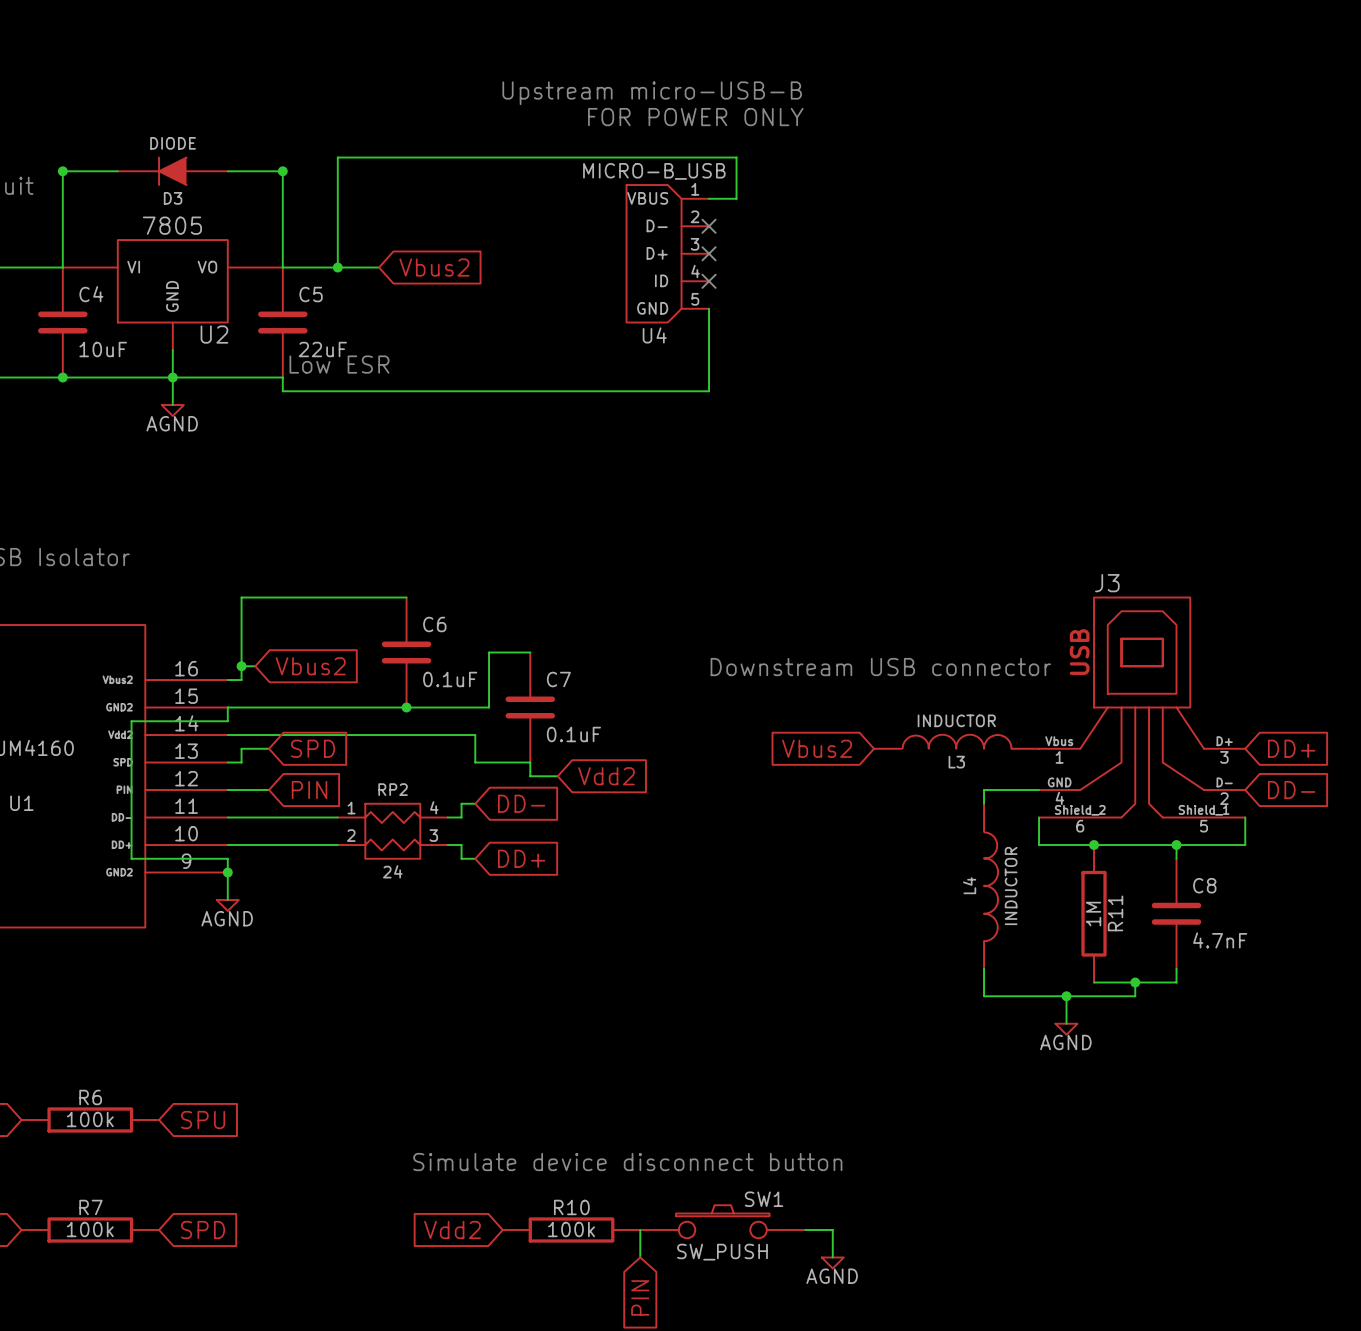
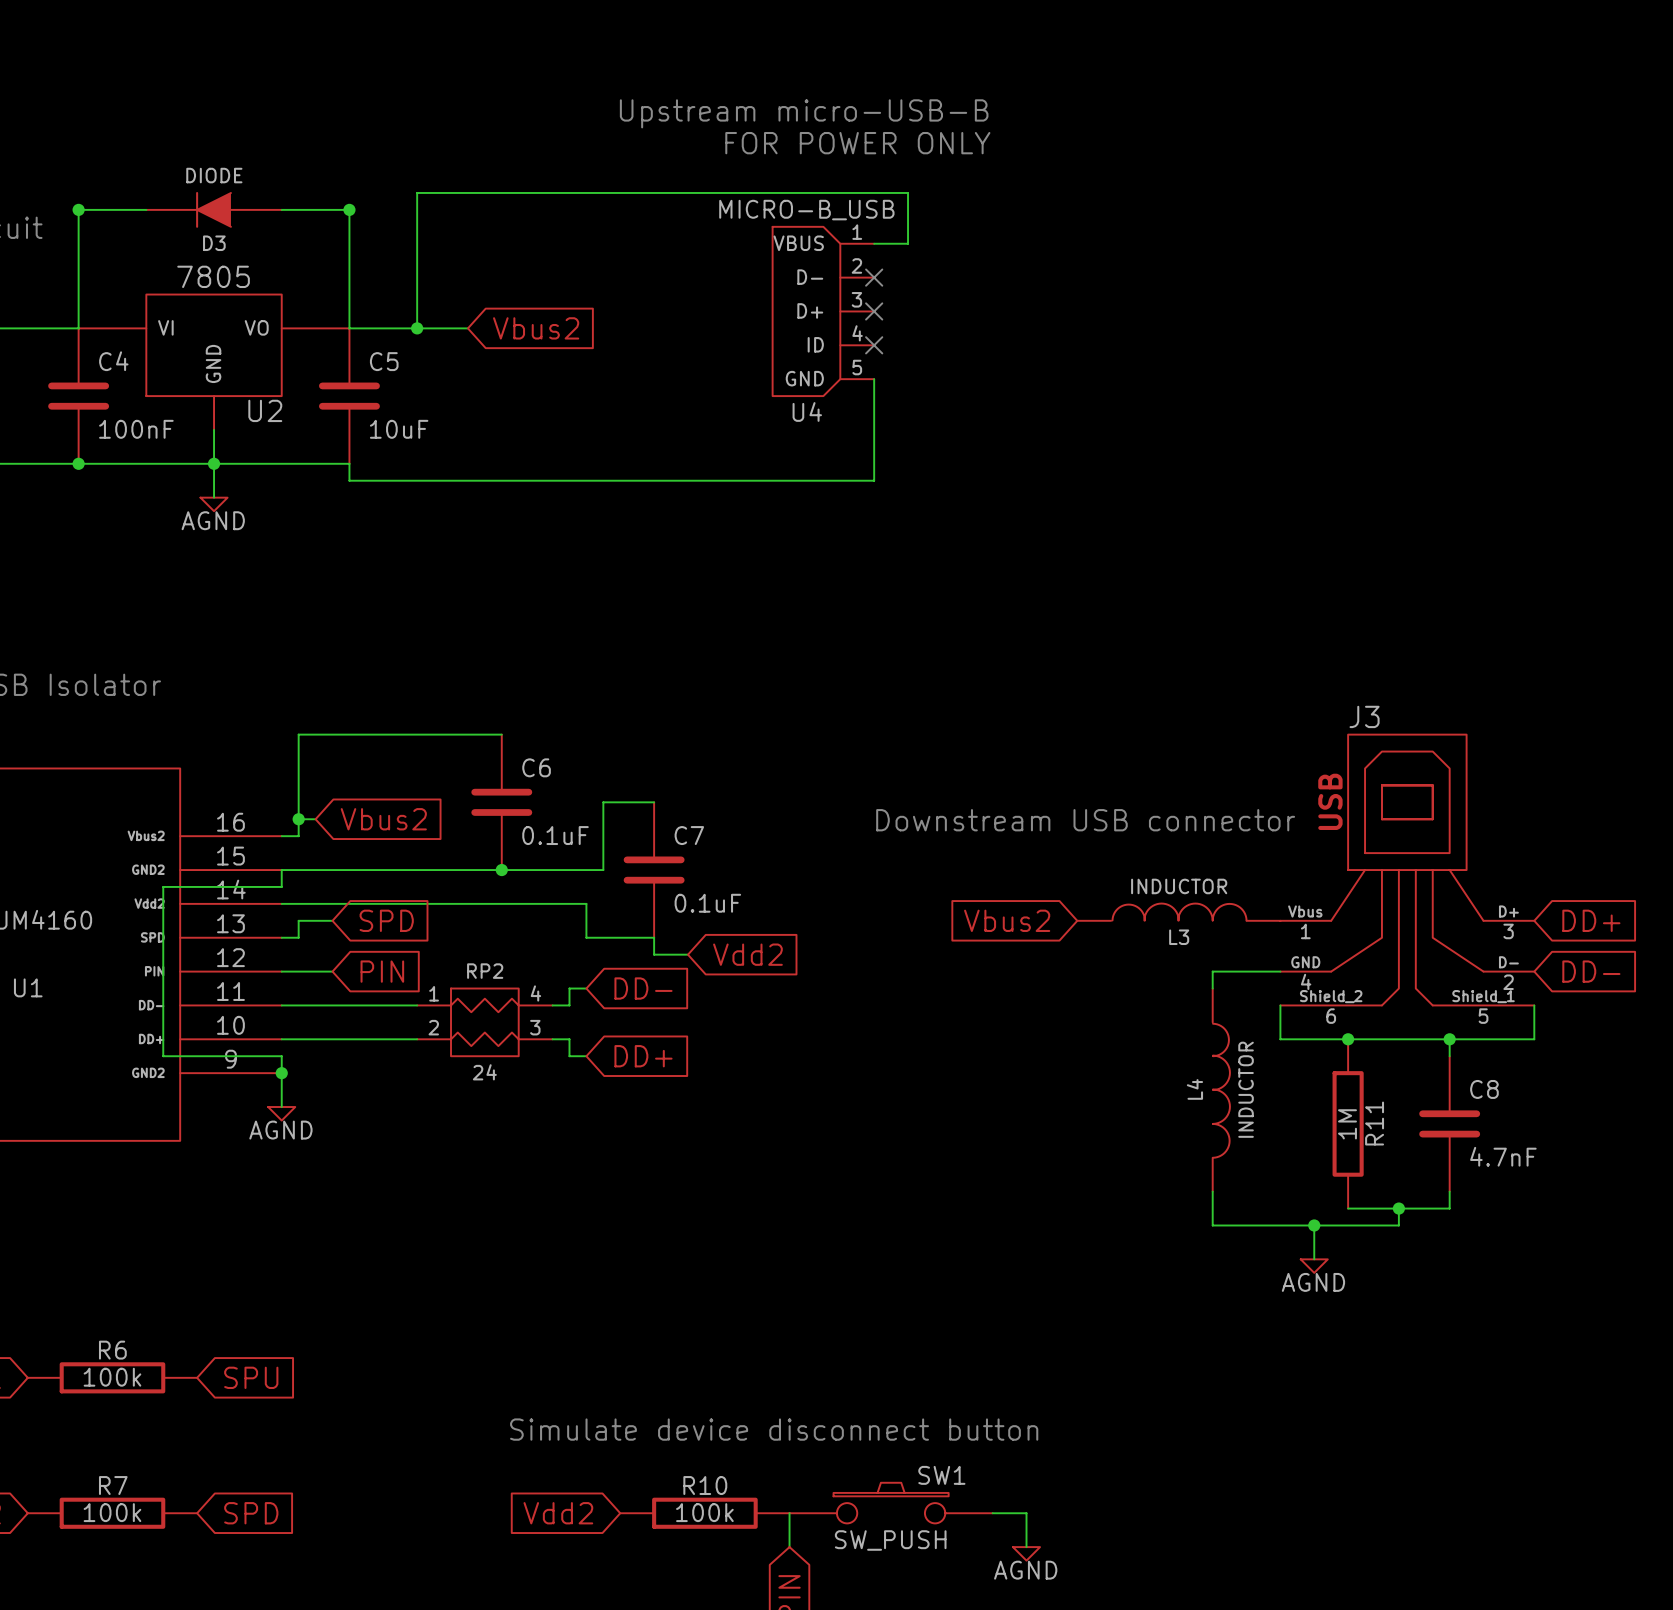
C4 value: 10uF (103, 349) -> 100nF (136, 429)
C5 value: 22uF (322, 349) -> 10uF (399, 429)
text: Low ESR (339, 364) -> none

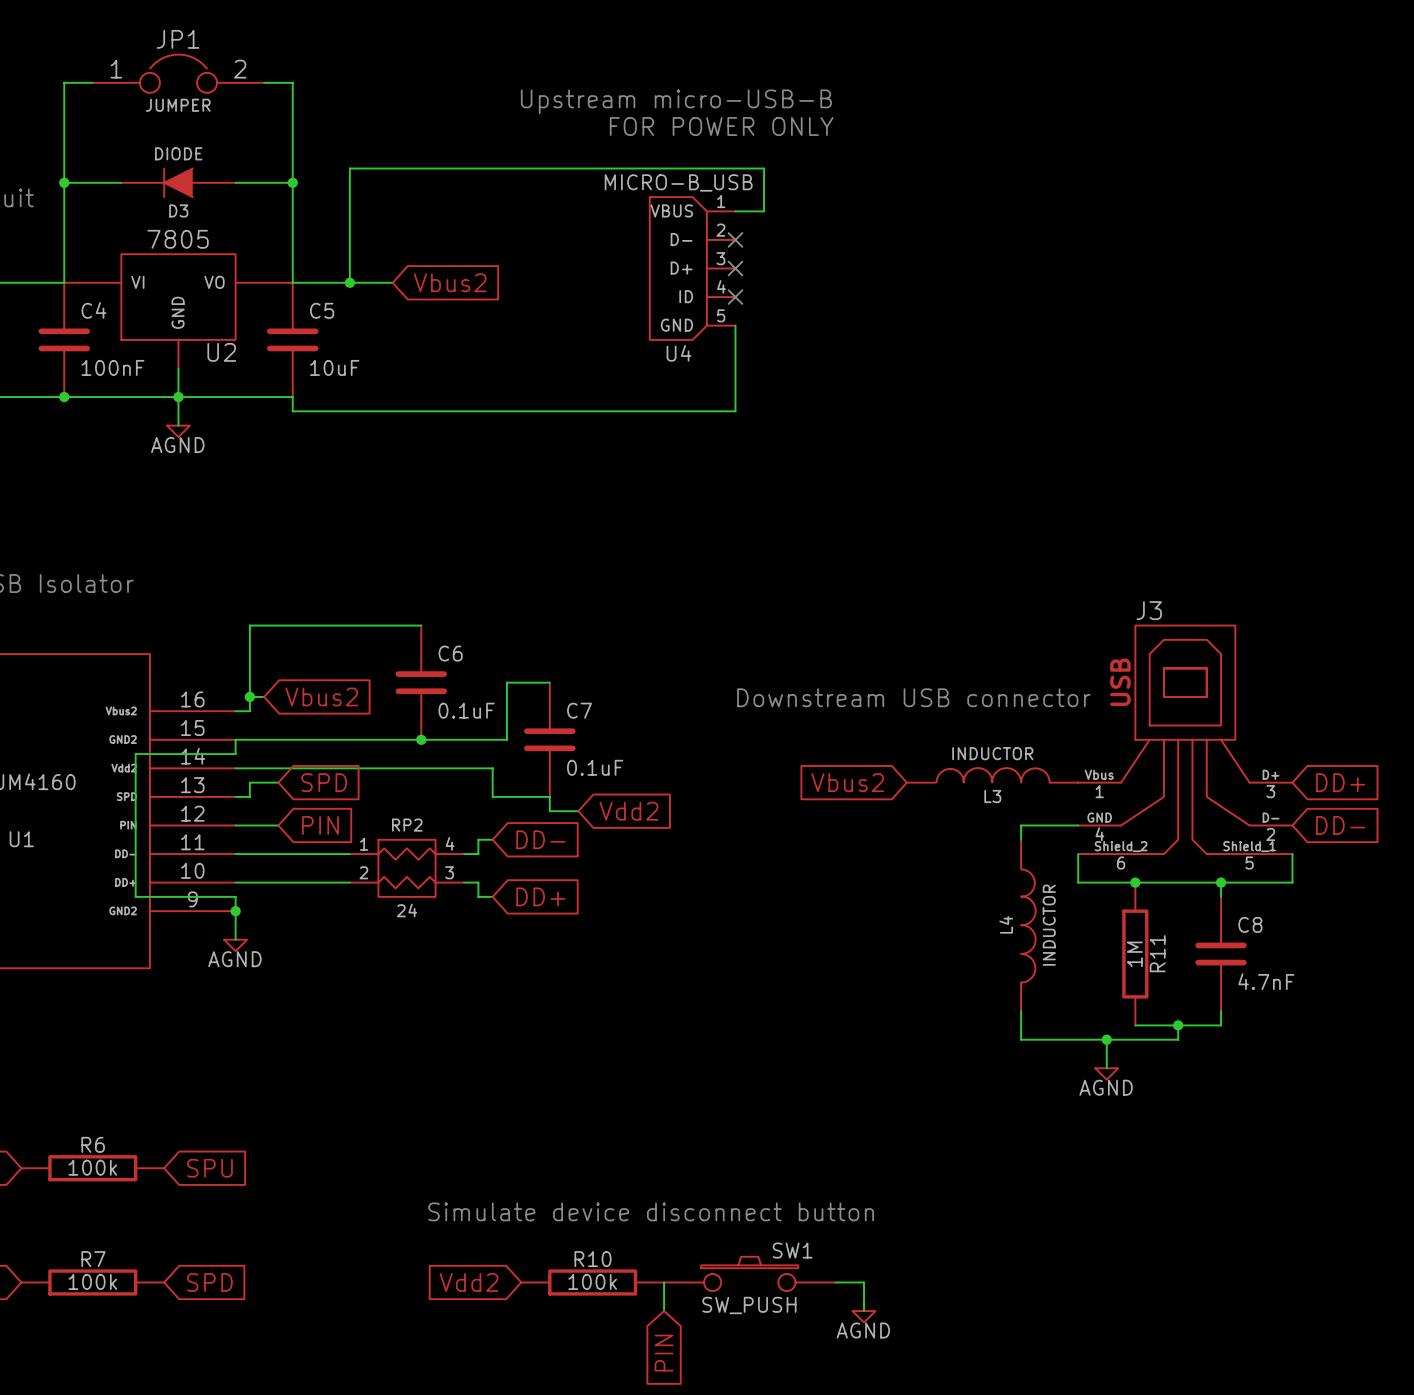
JP1: none -> JUMPER (178, 73)
wire: none -> (92, 82) (64, 82) (64, 182)
wire: none -> (264, 82) (292, 82) (292, 182)

